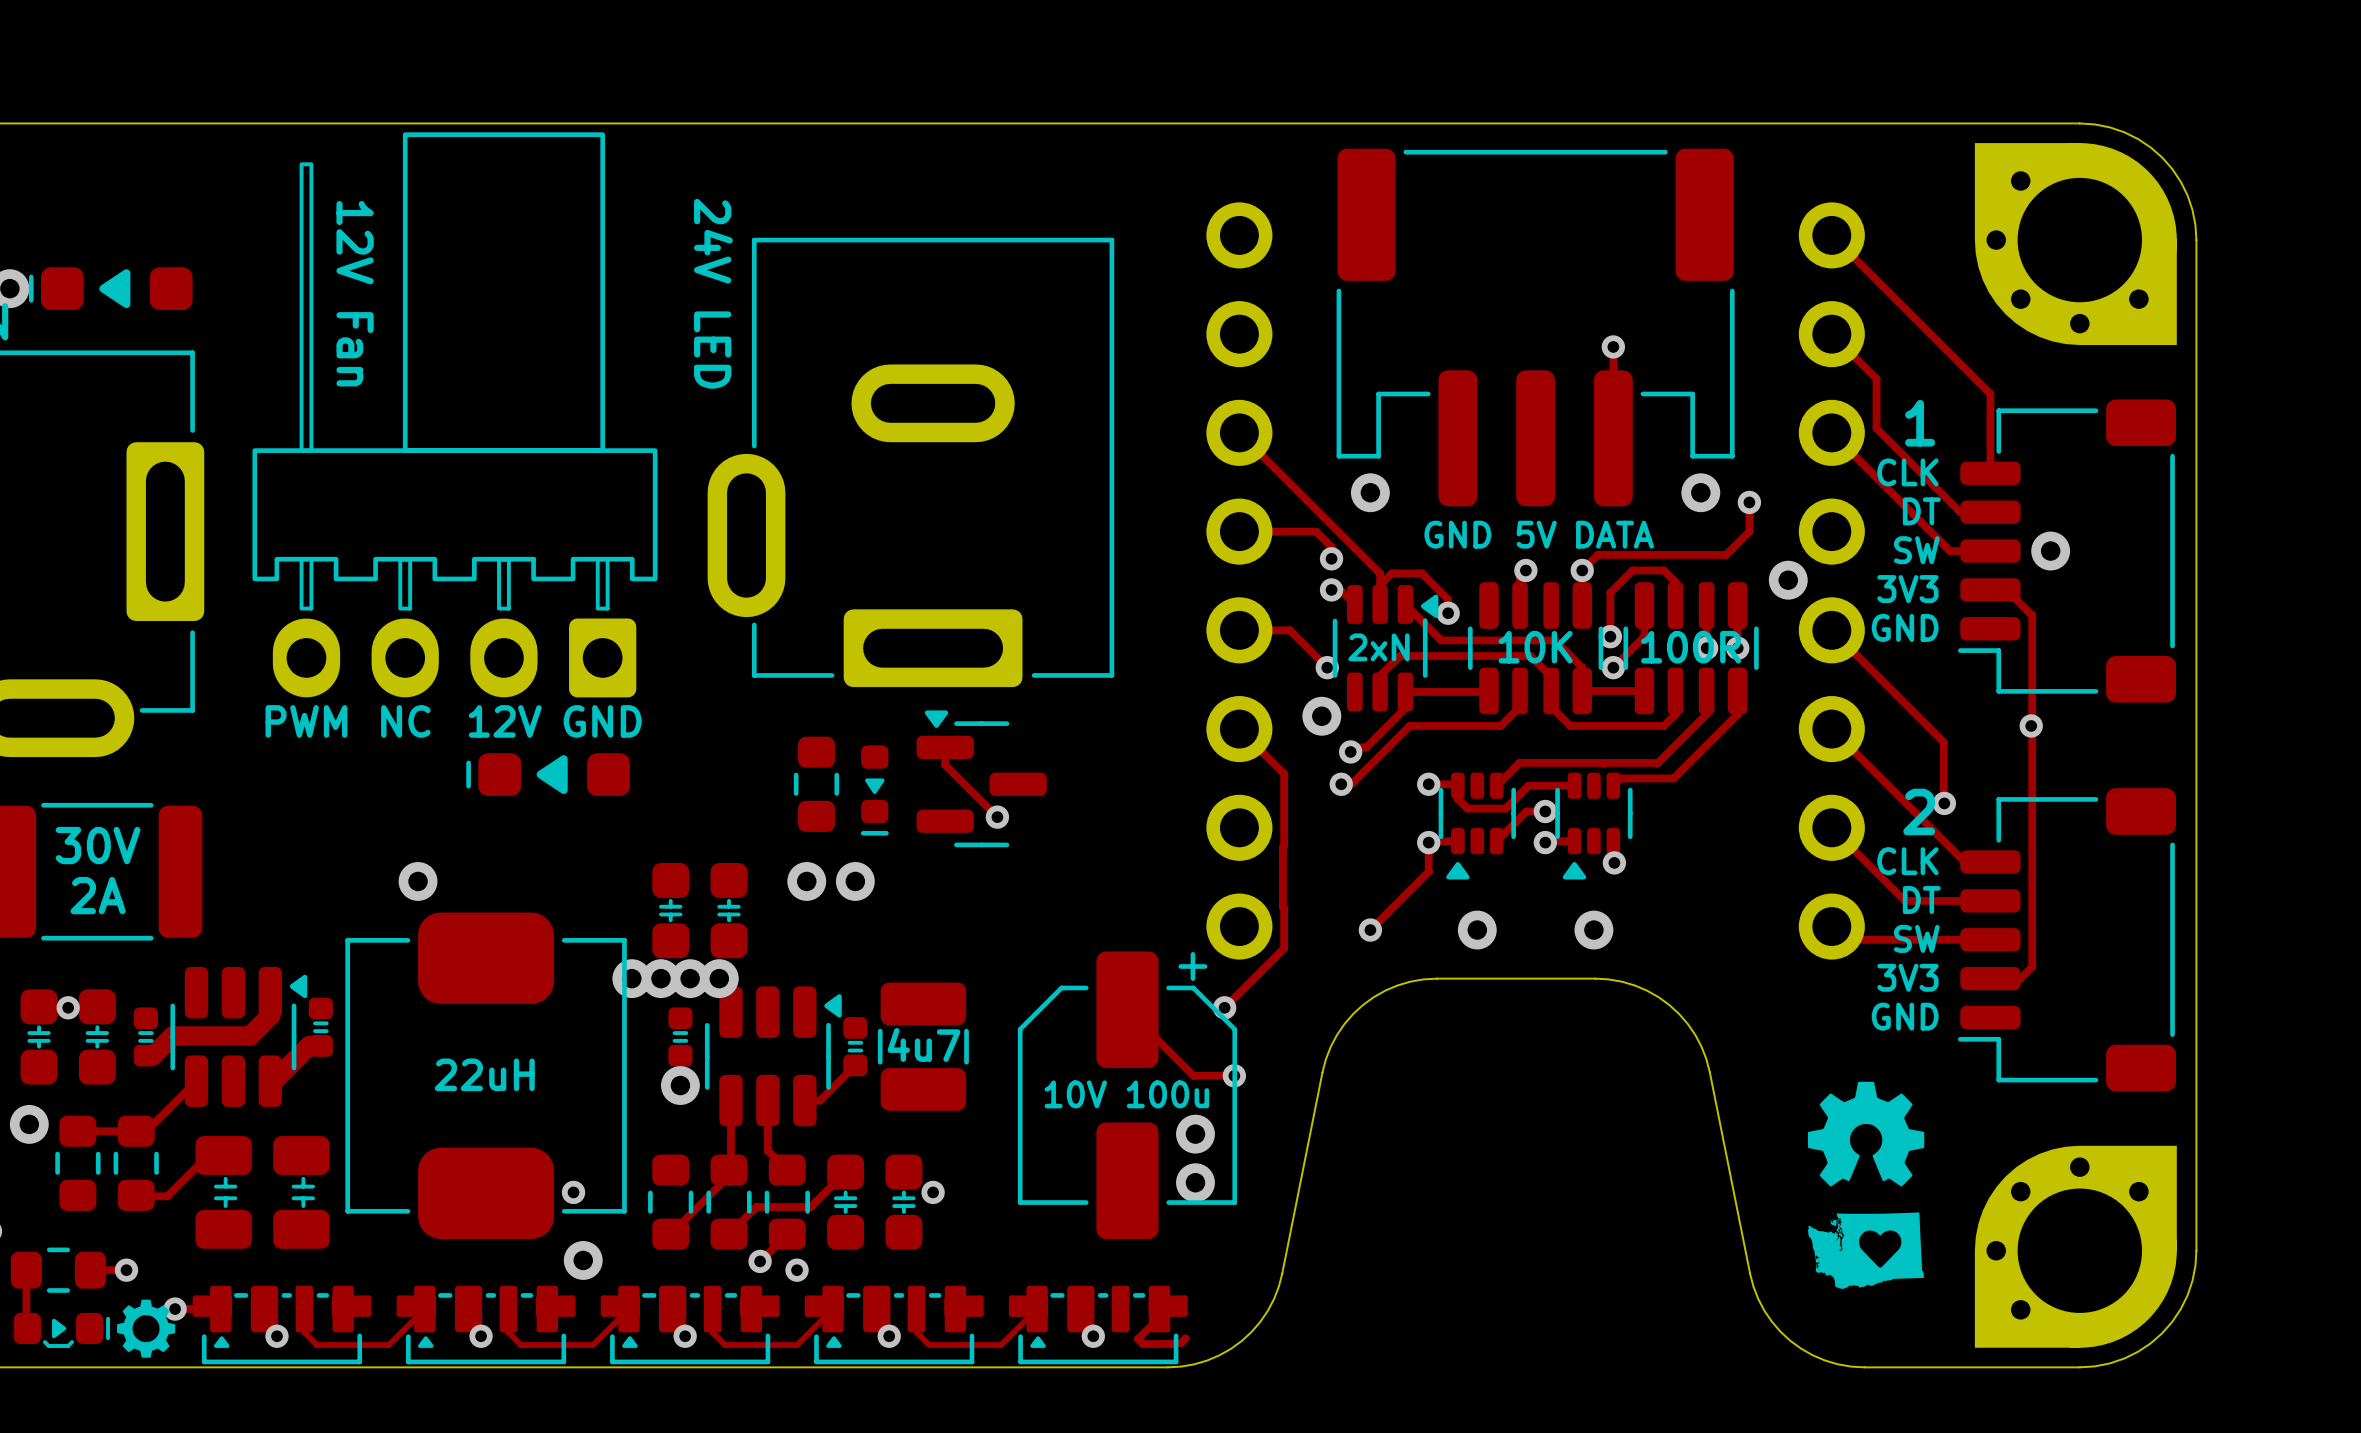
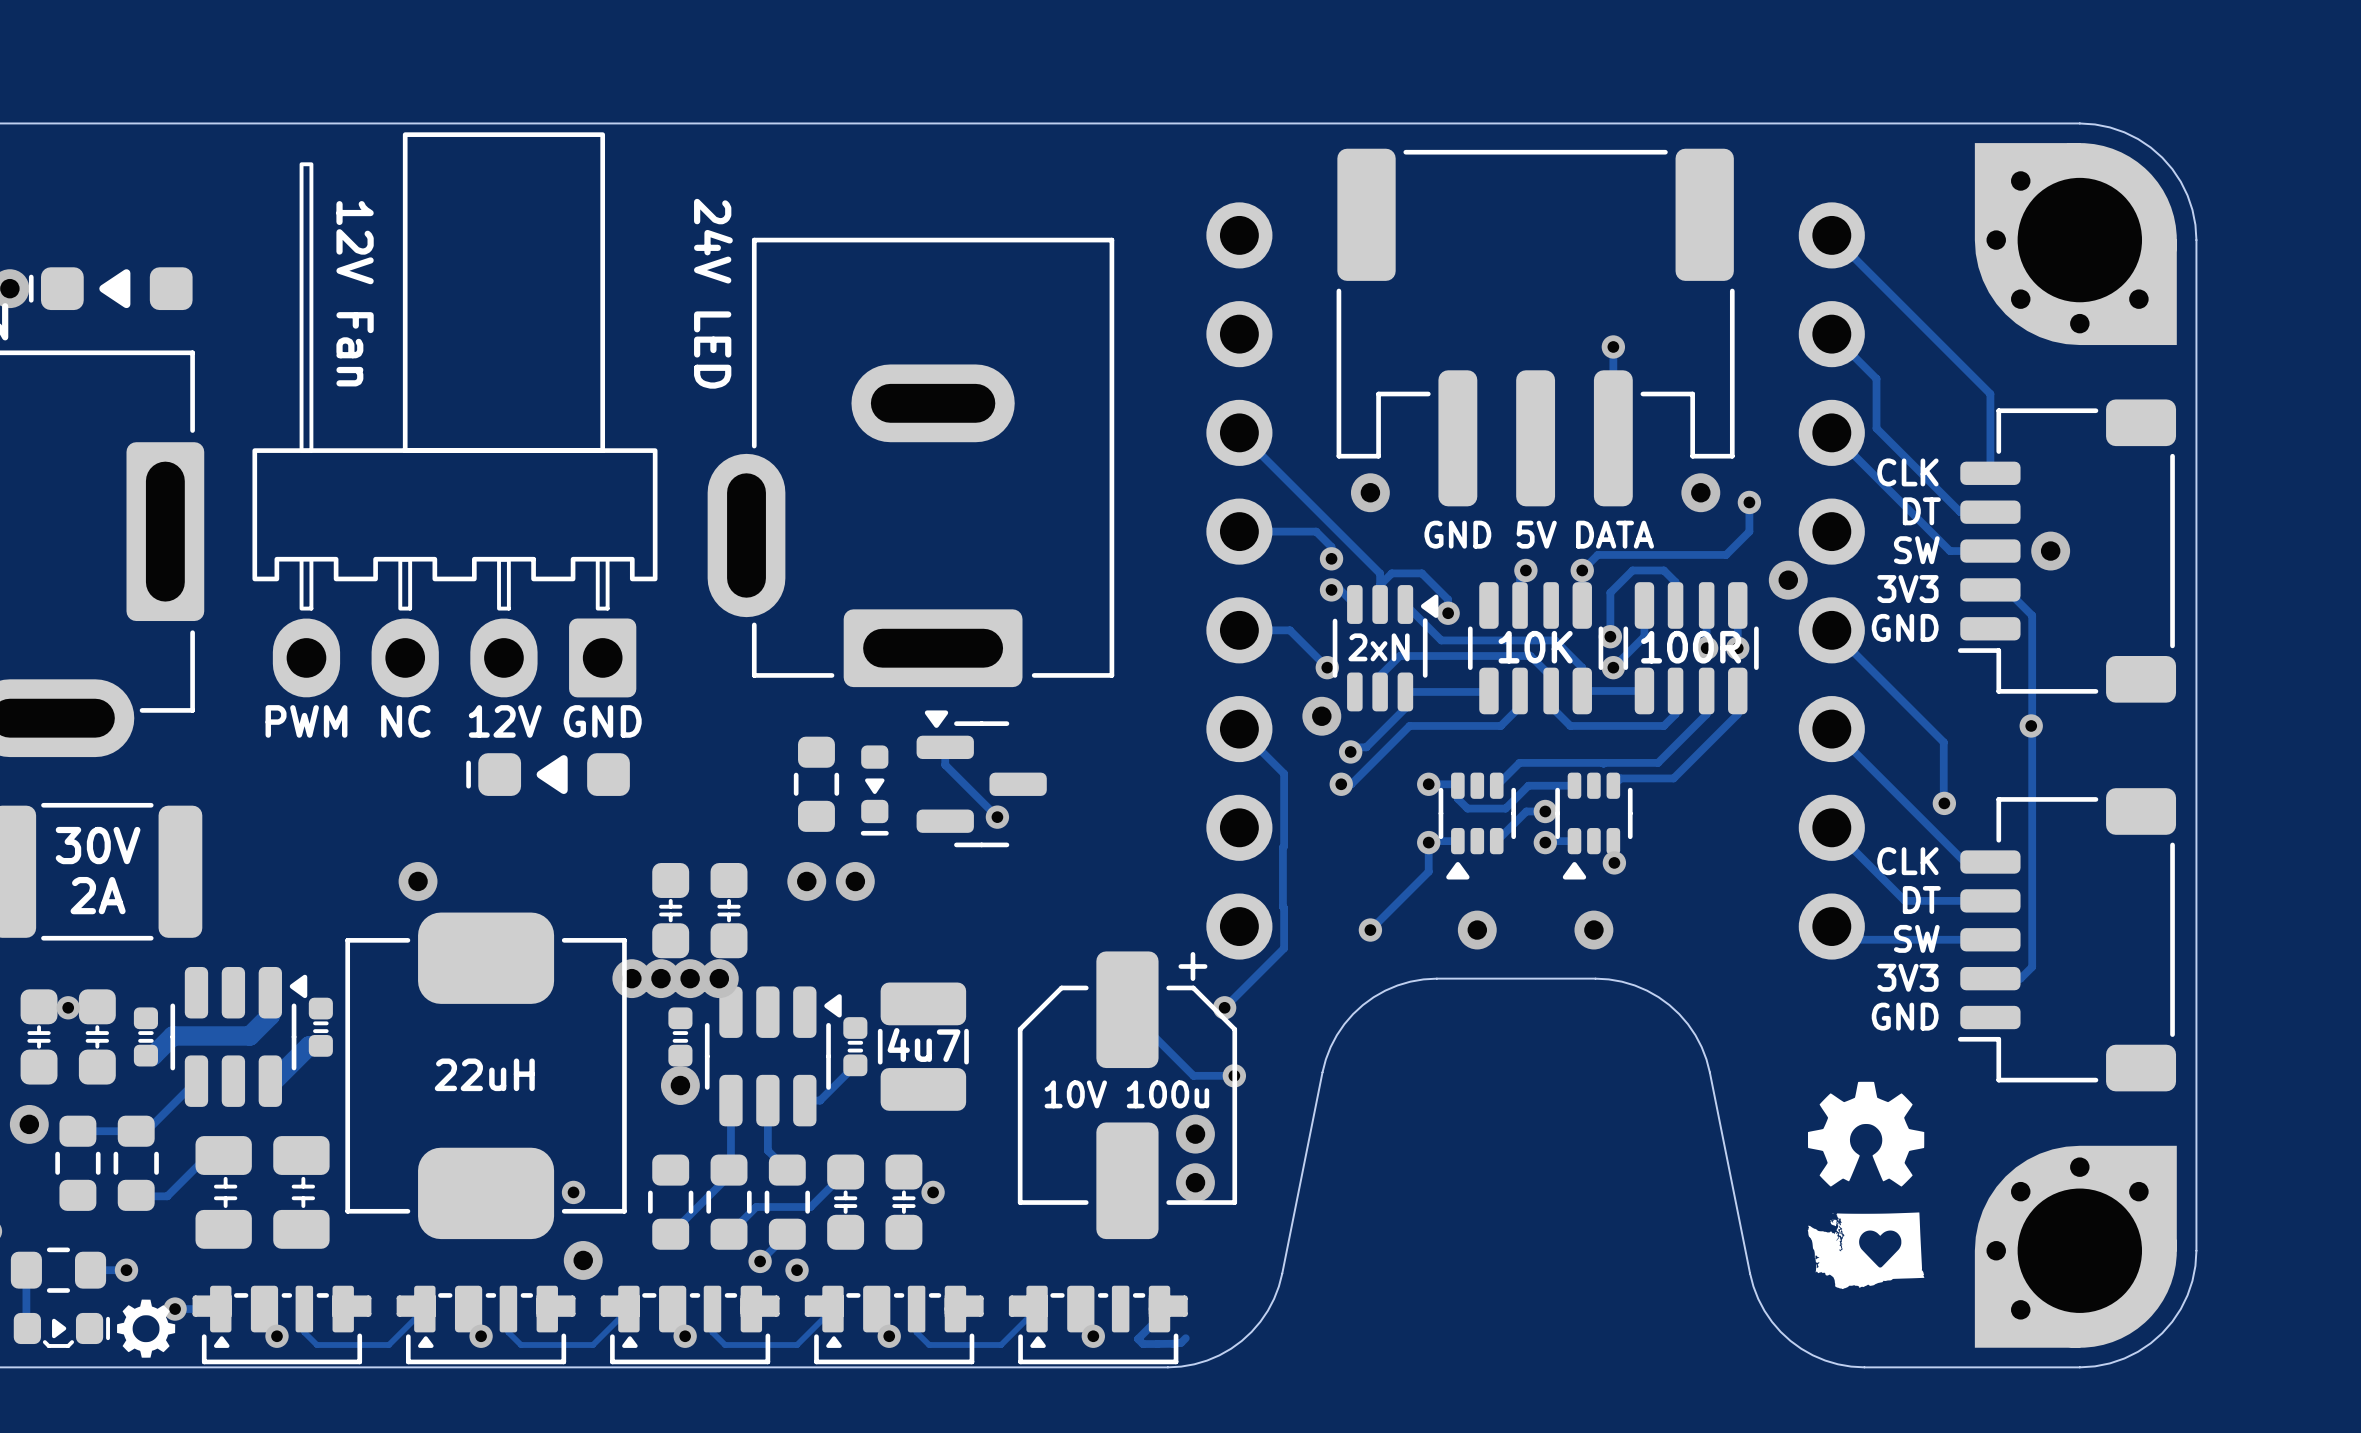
text: 1 (1920, 423) -> none
text: 2 (1919, 811) -> none

